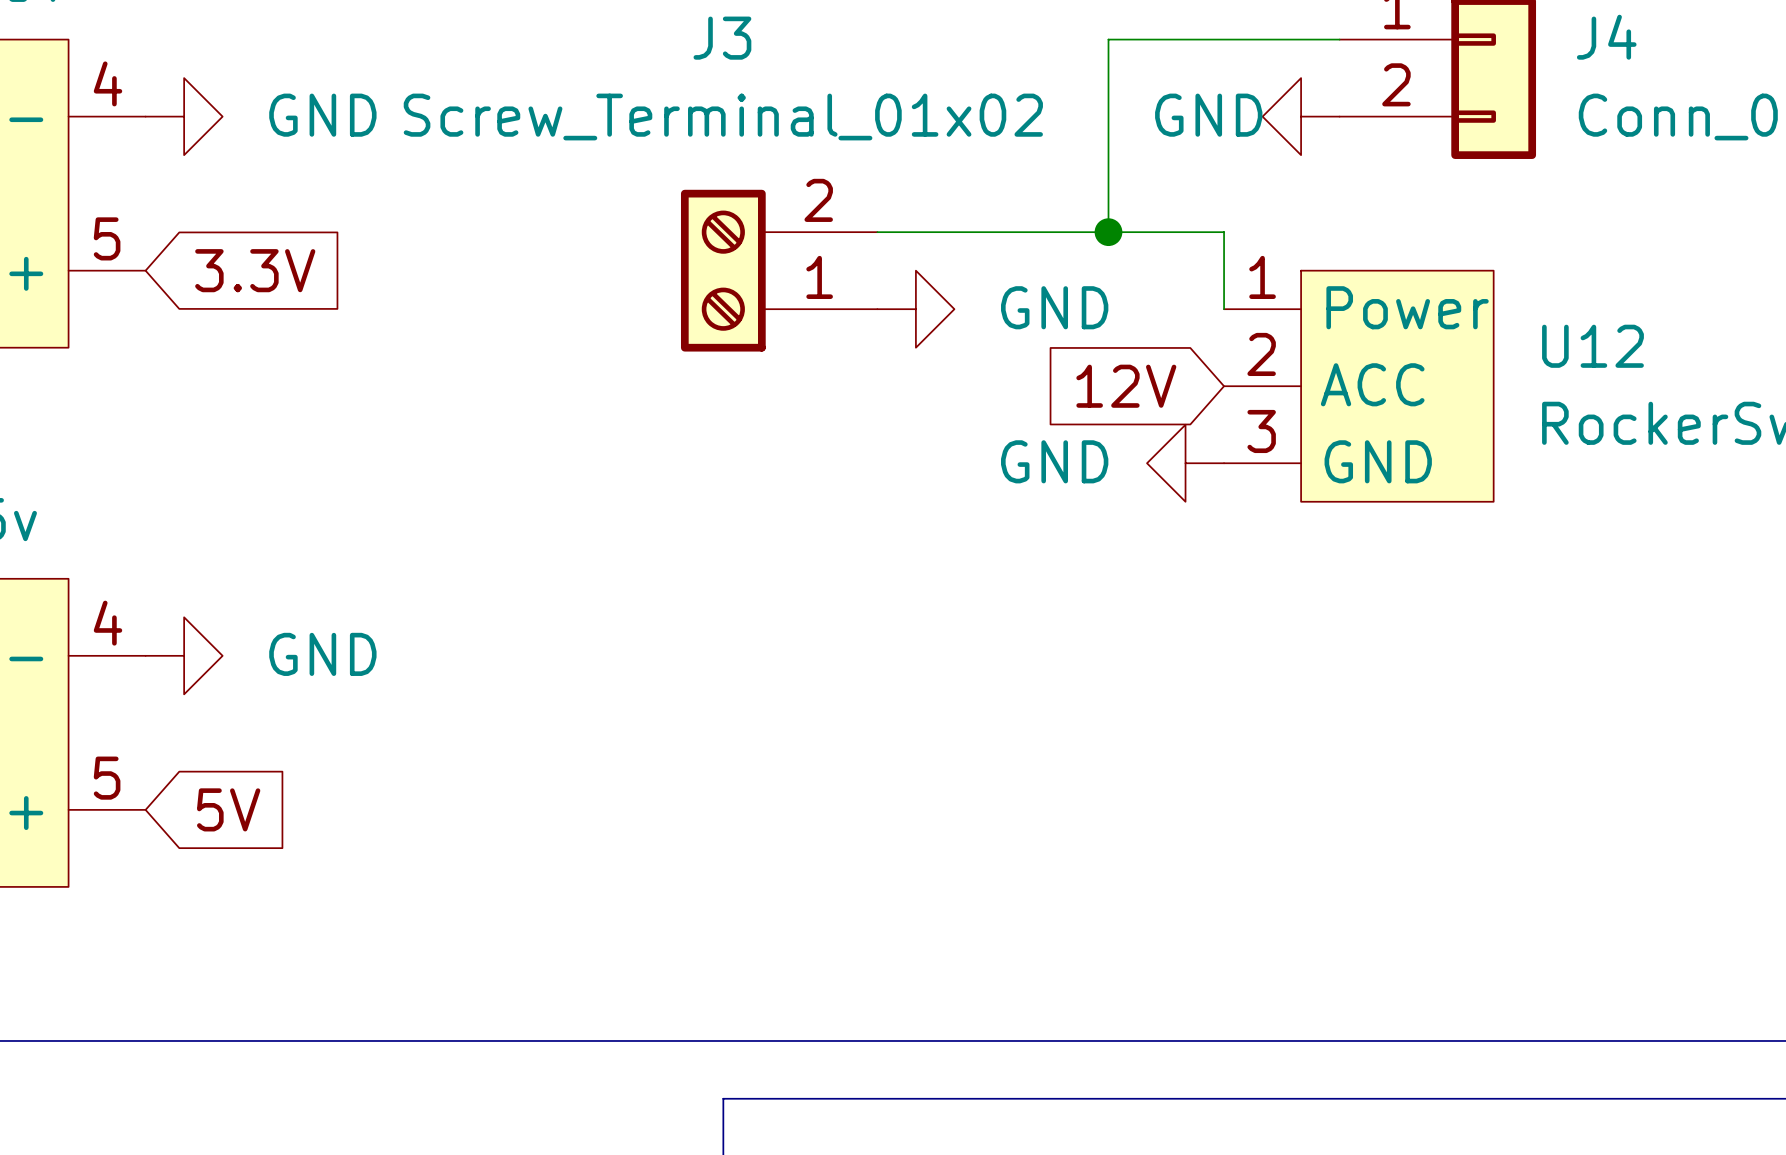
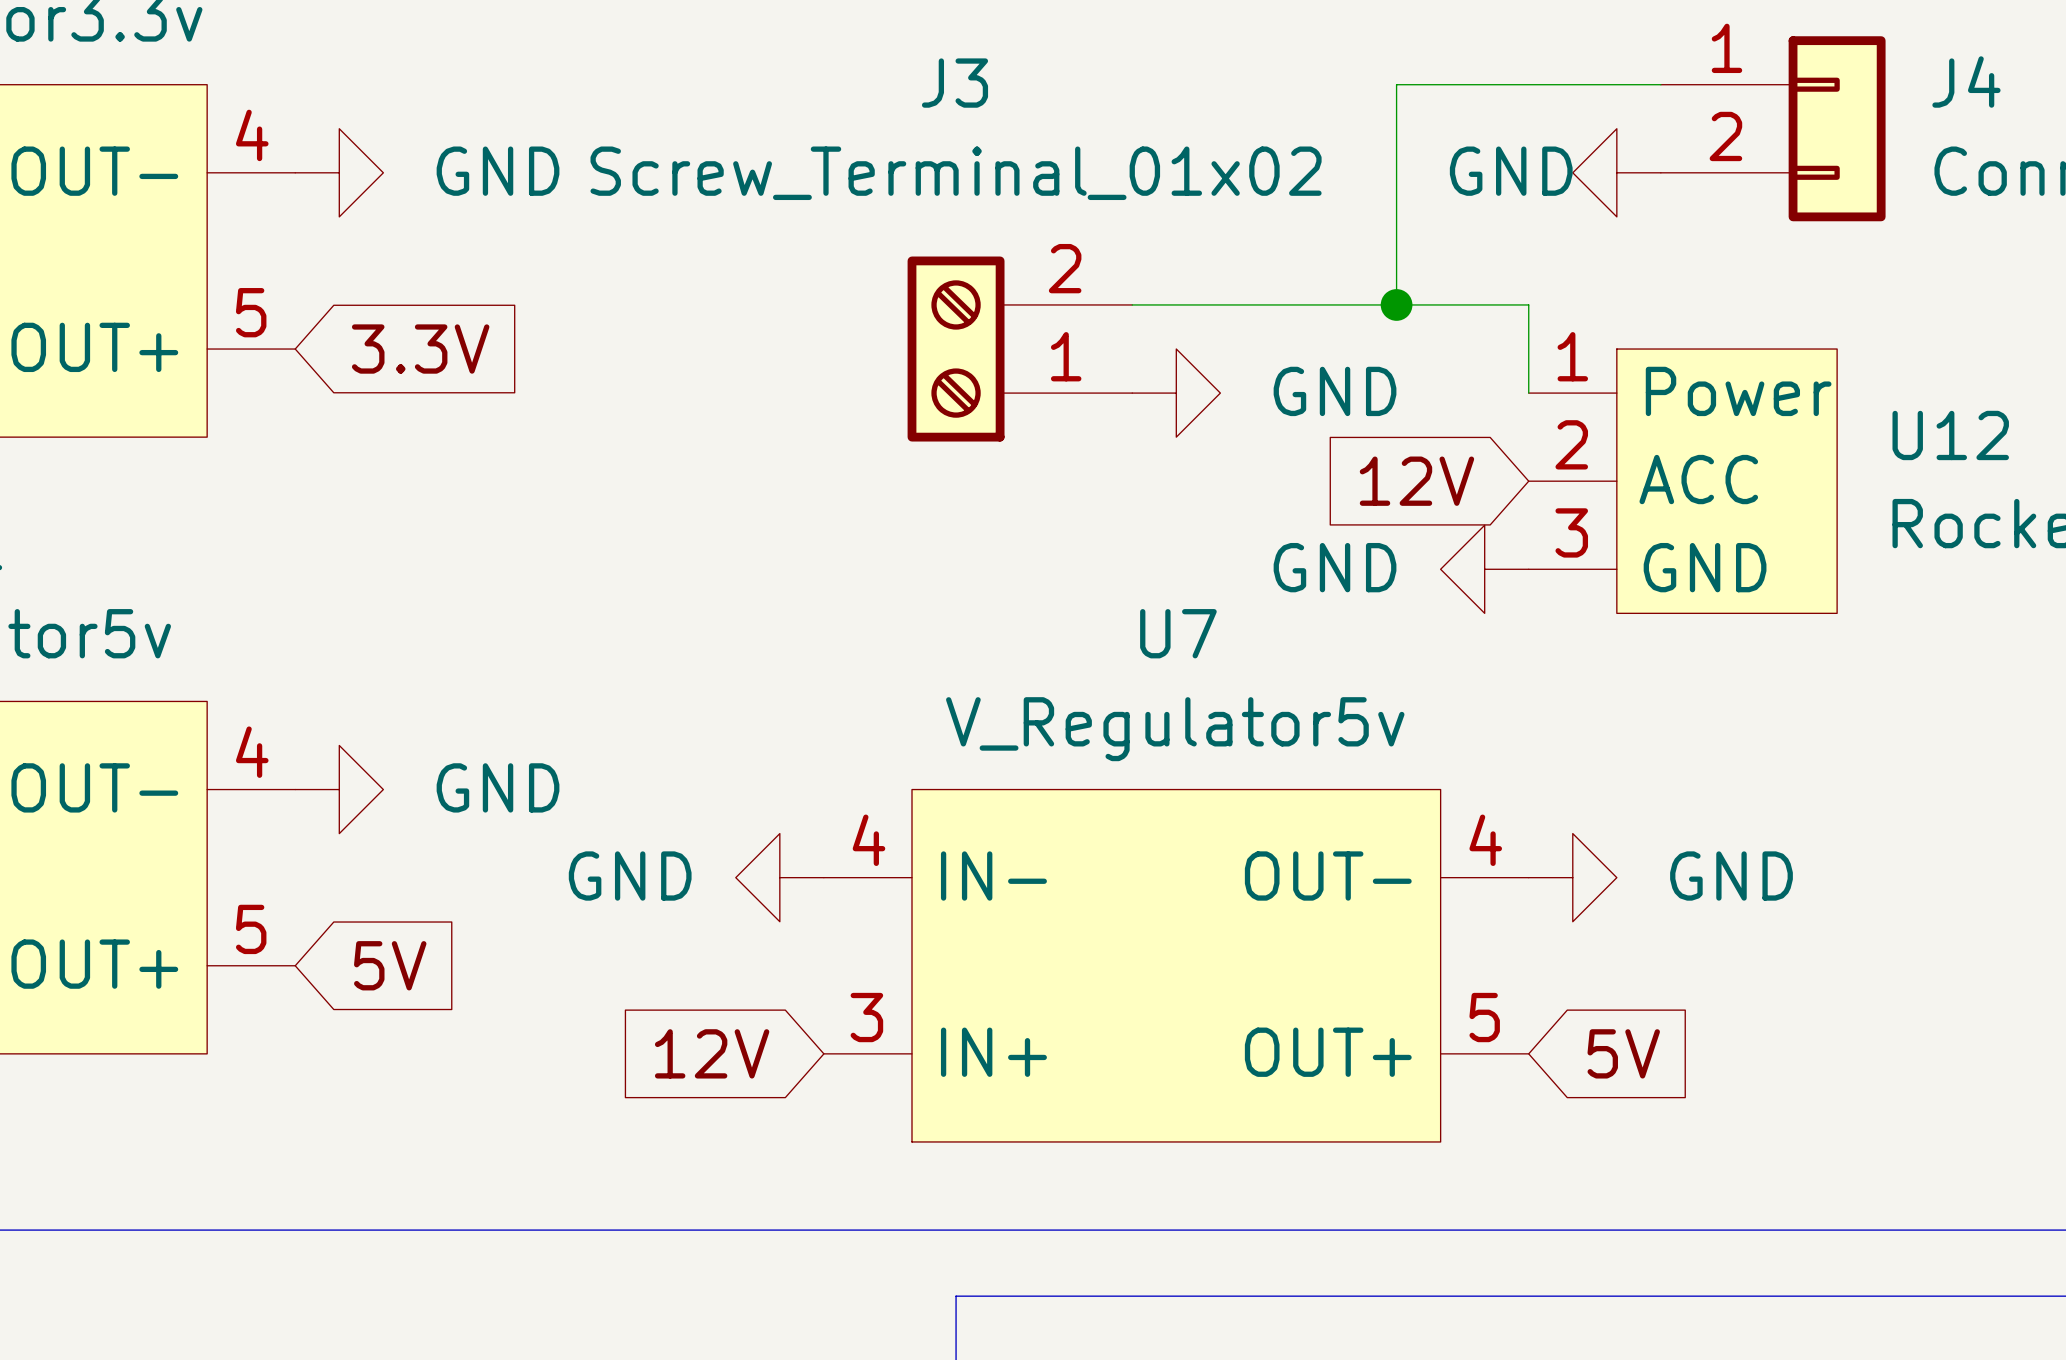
power symbol: none -> GND (779, 877)
power symbol: none -> GND (1572, 877)
U7: none -> V_Regulator5v (1176, 965)
global label: none -> 12V (712, 1053)
global label: none -> 5V (1623, 1053)

